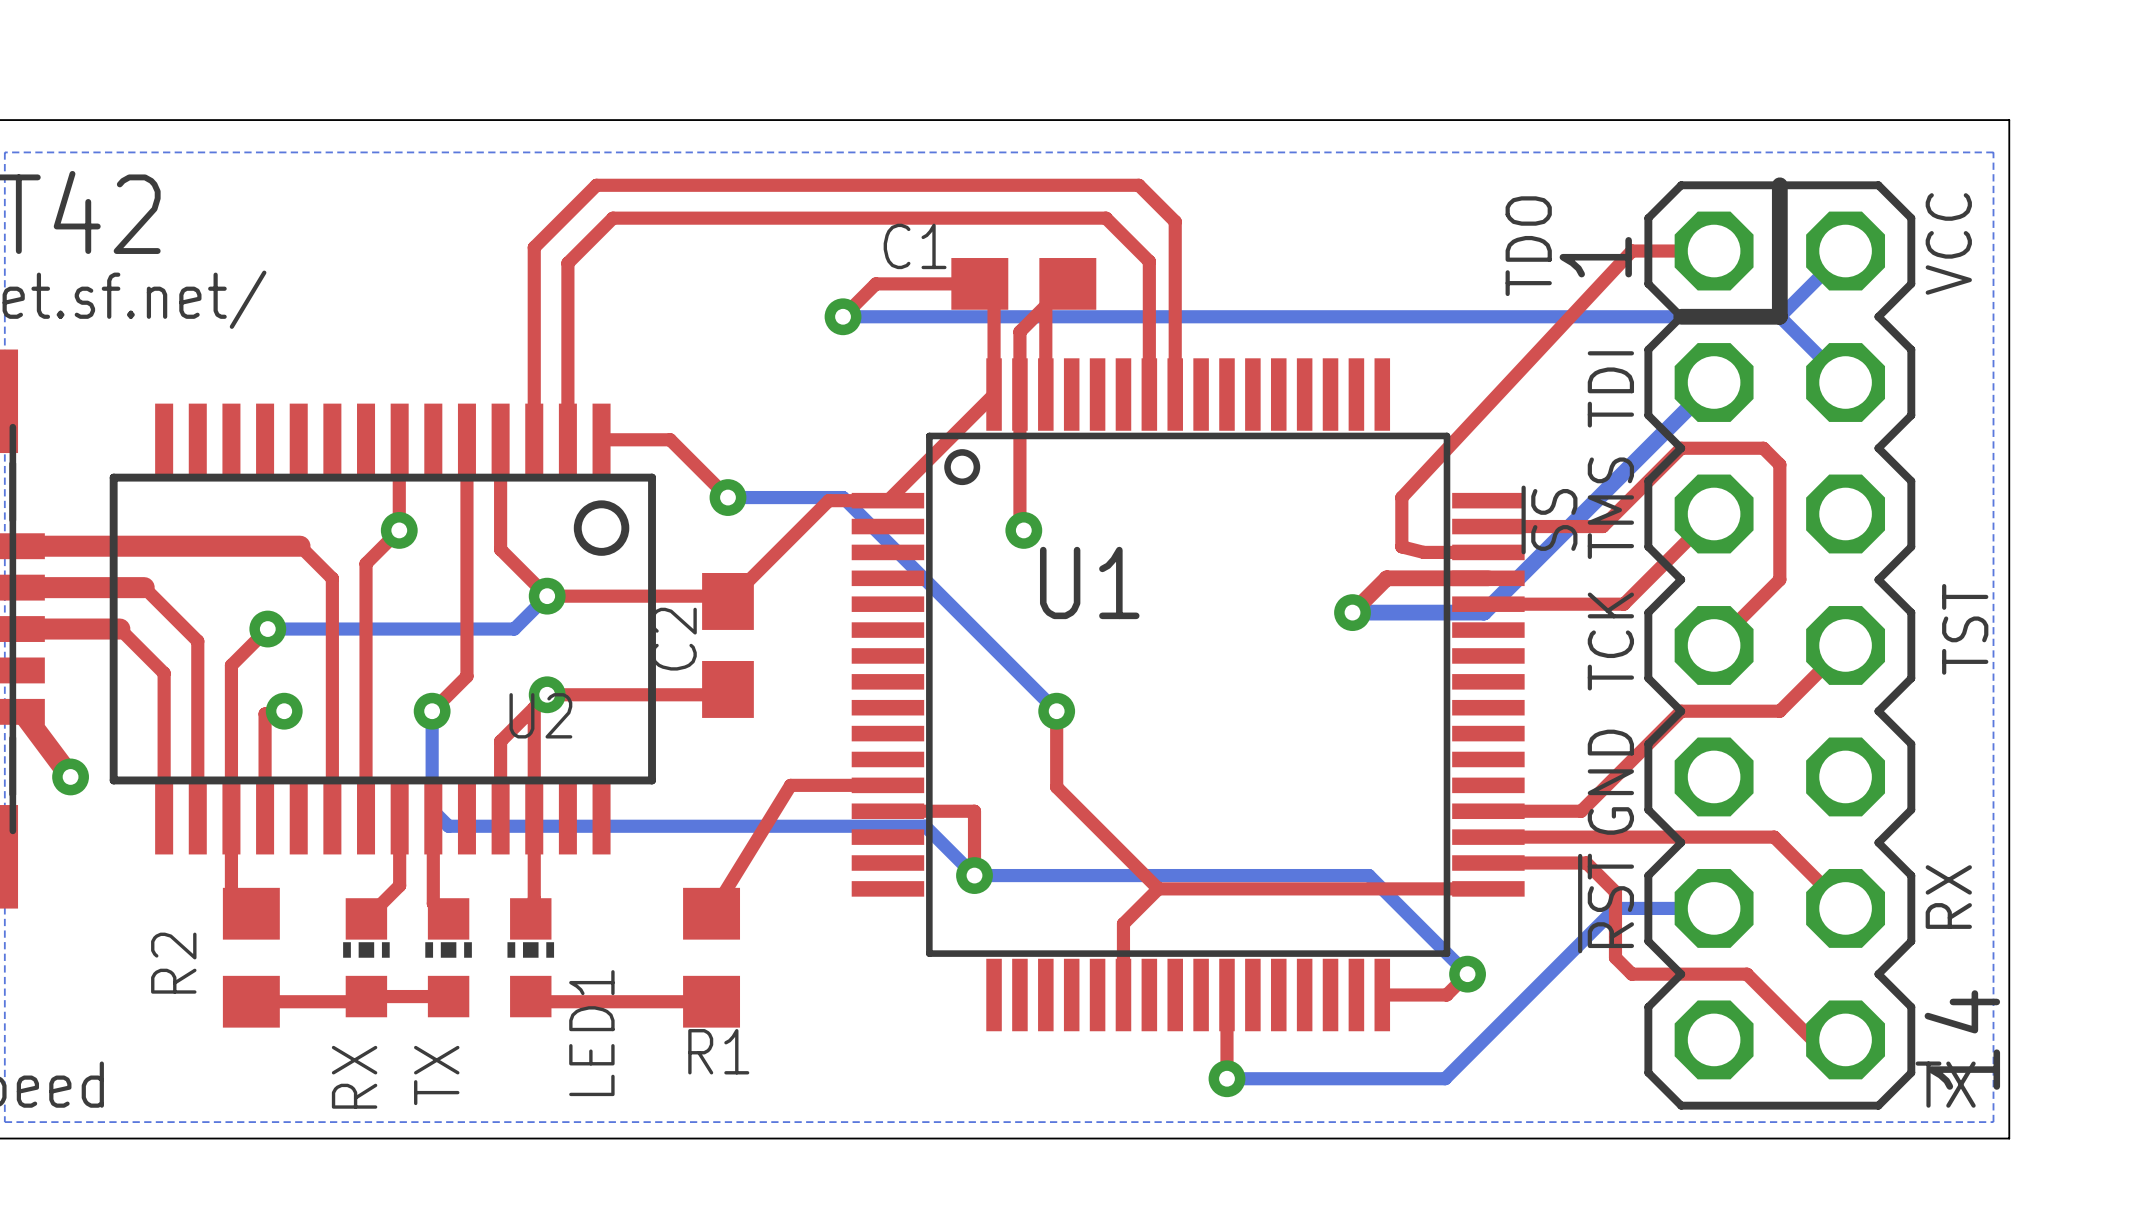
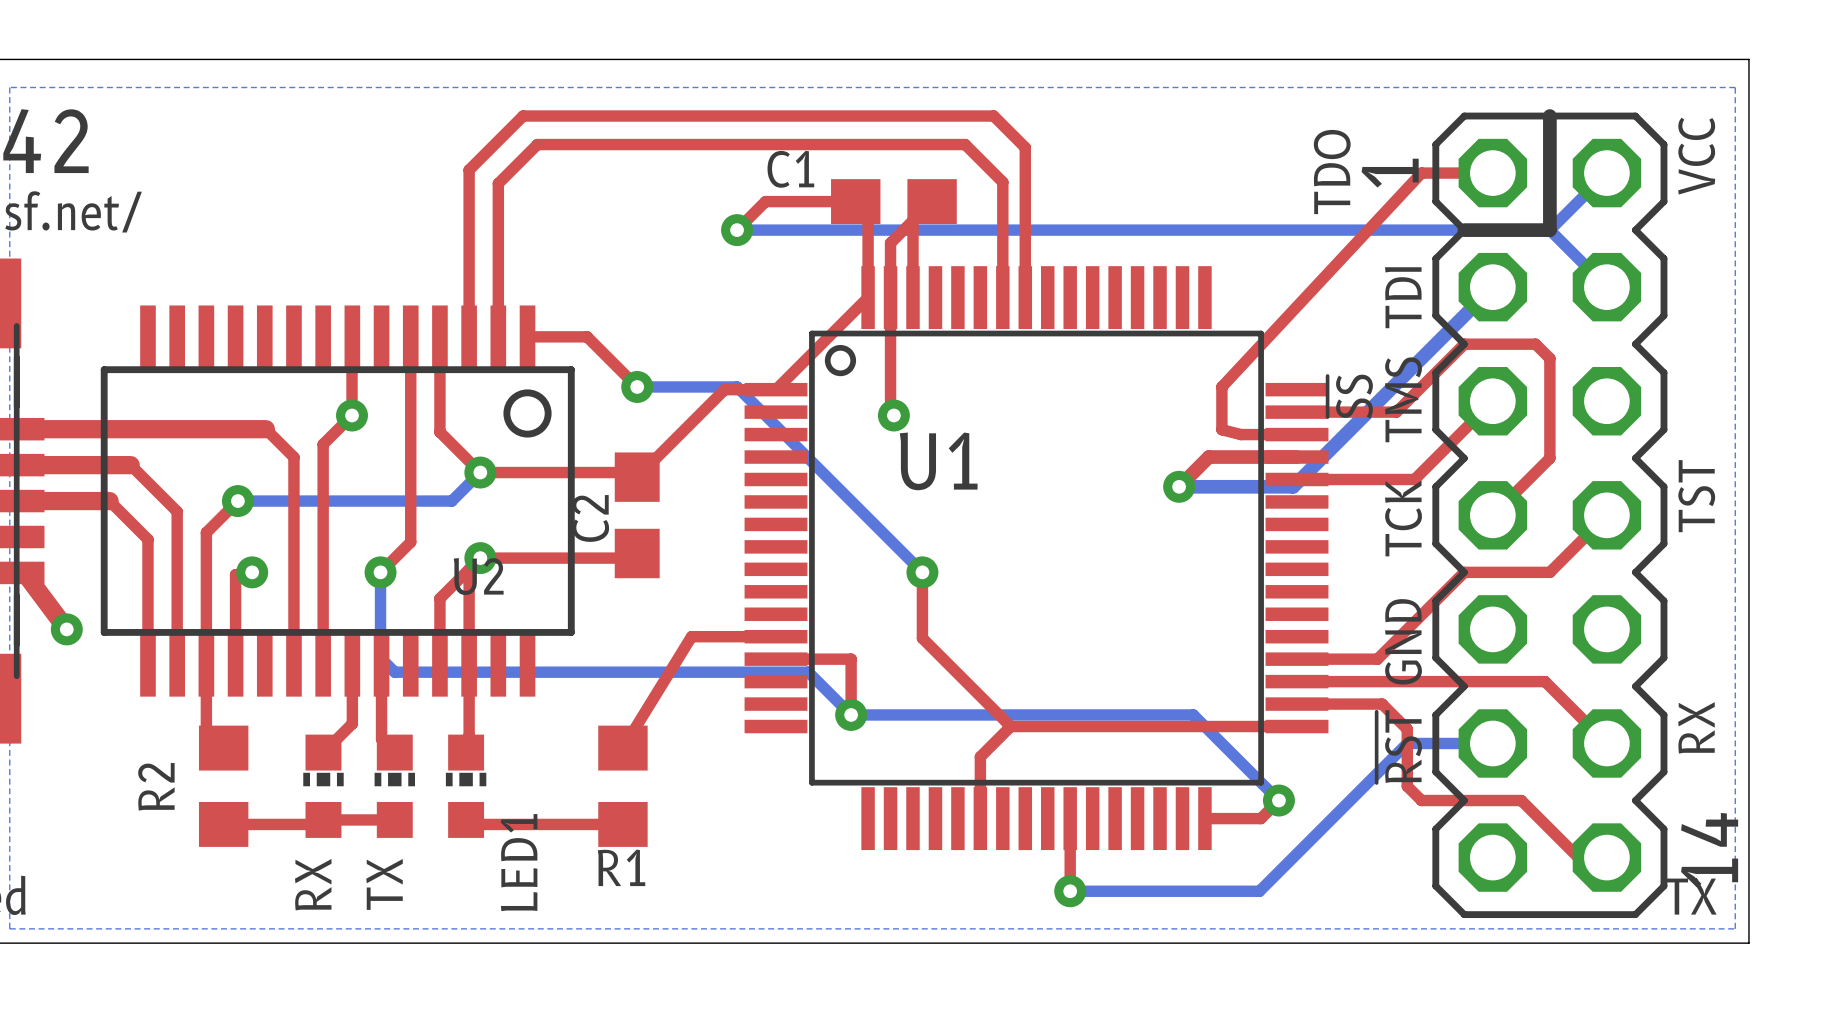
text position: TST (1965, 629) -> TST (1696, 496)

